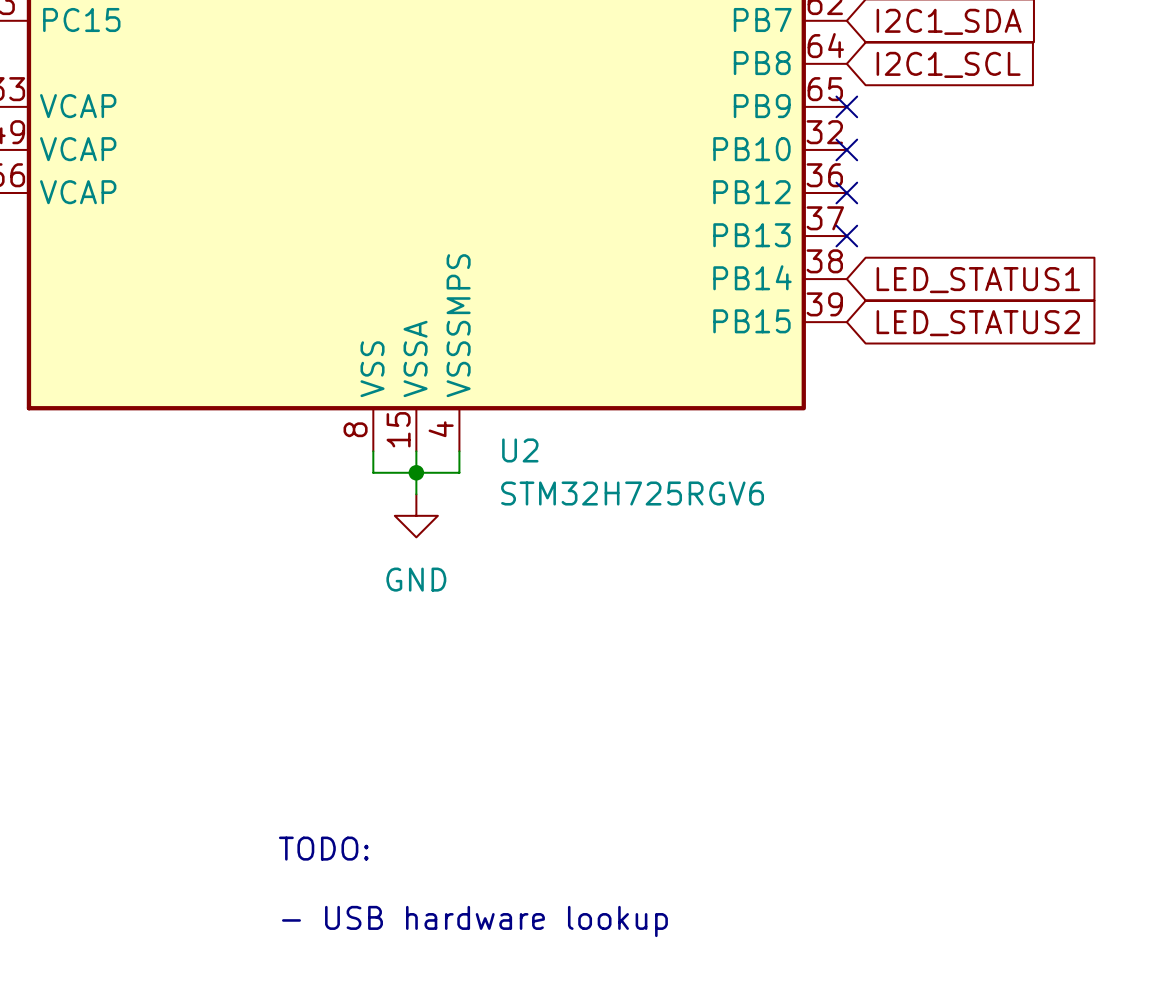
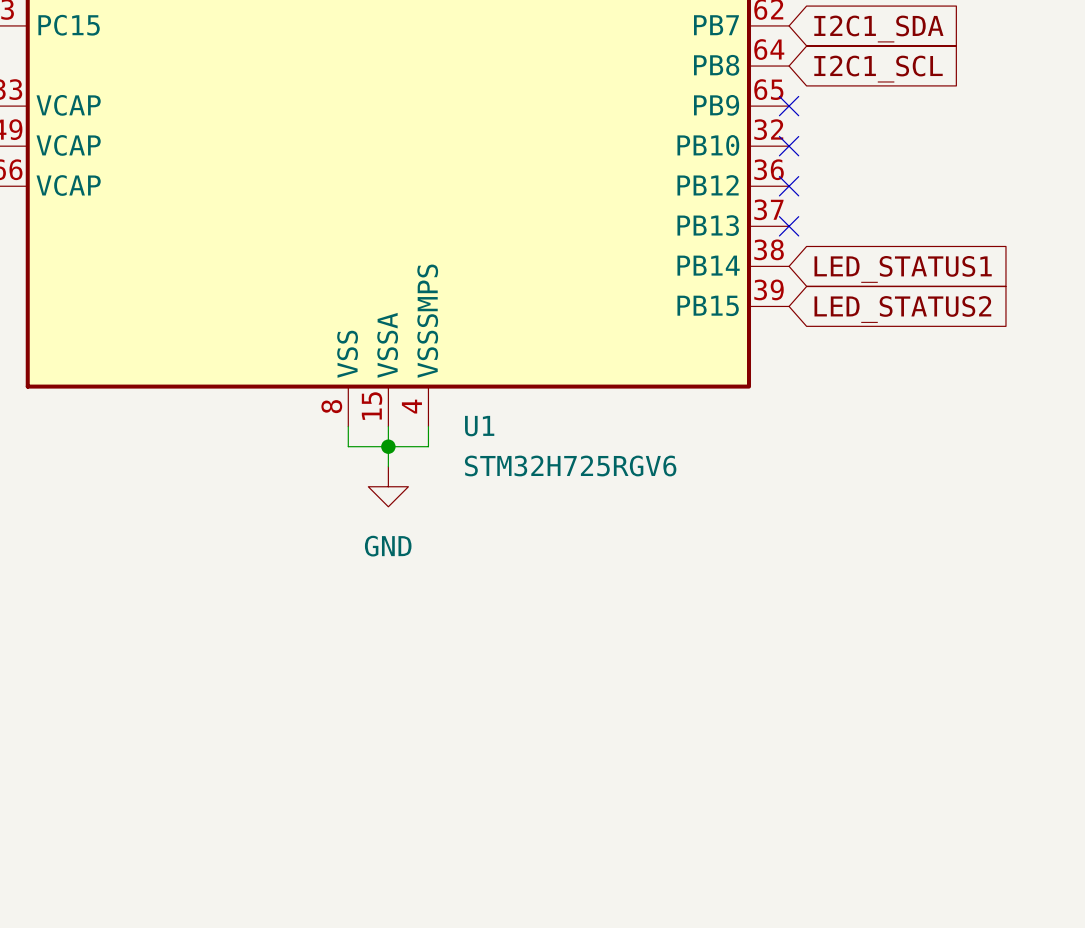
U2 name: U2 (520, 450) -> U1 (479, 426)
text: TODO: (323, 848) -> none
text: - USB hardware lookup (474, 921) -> none

